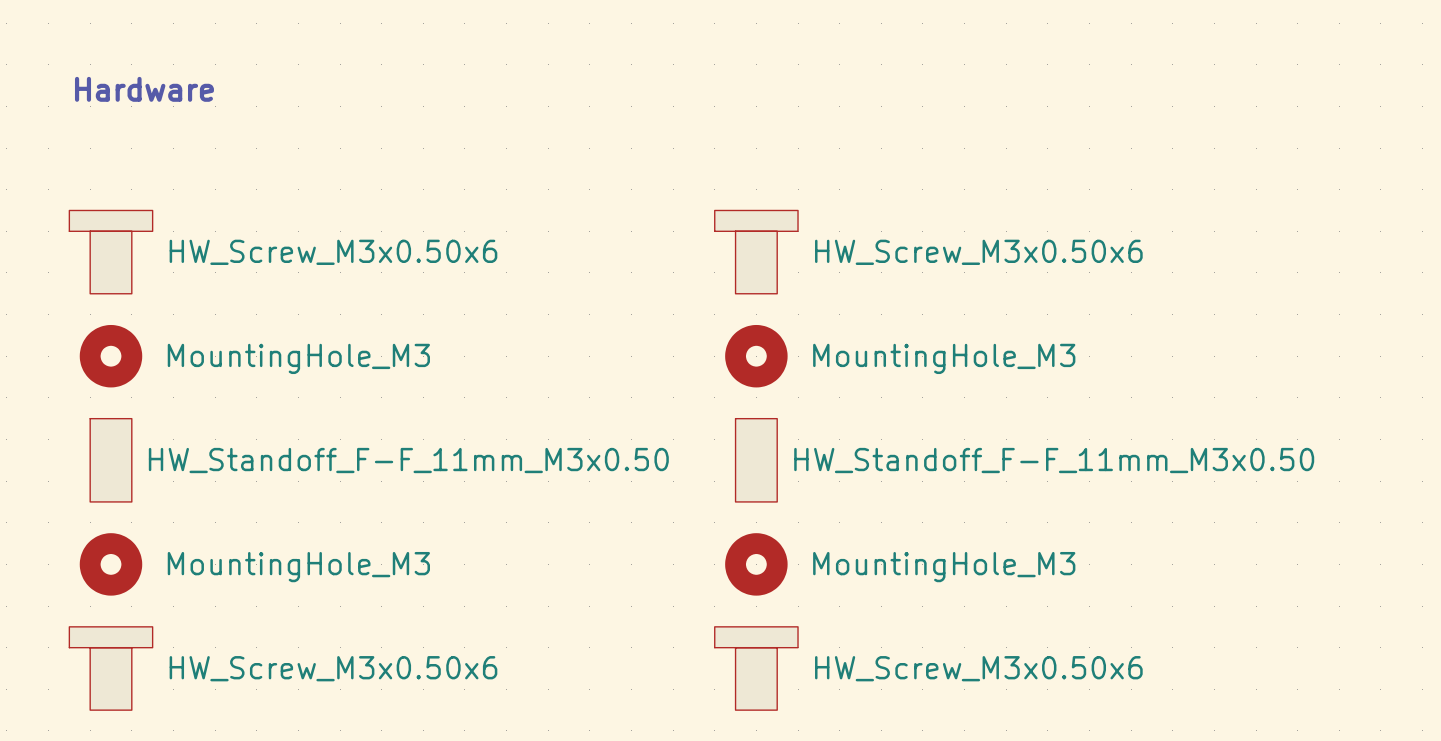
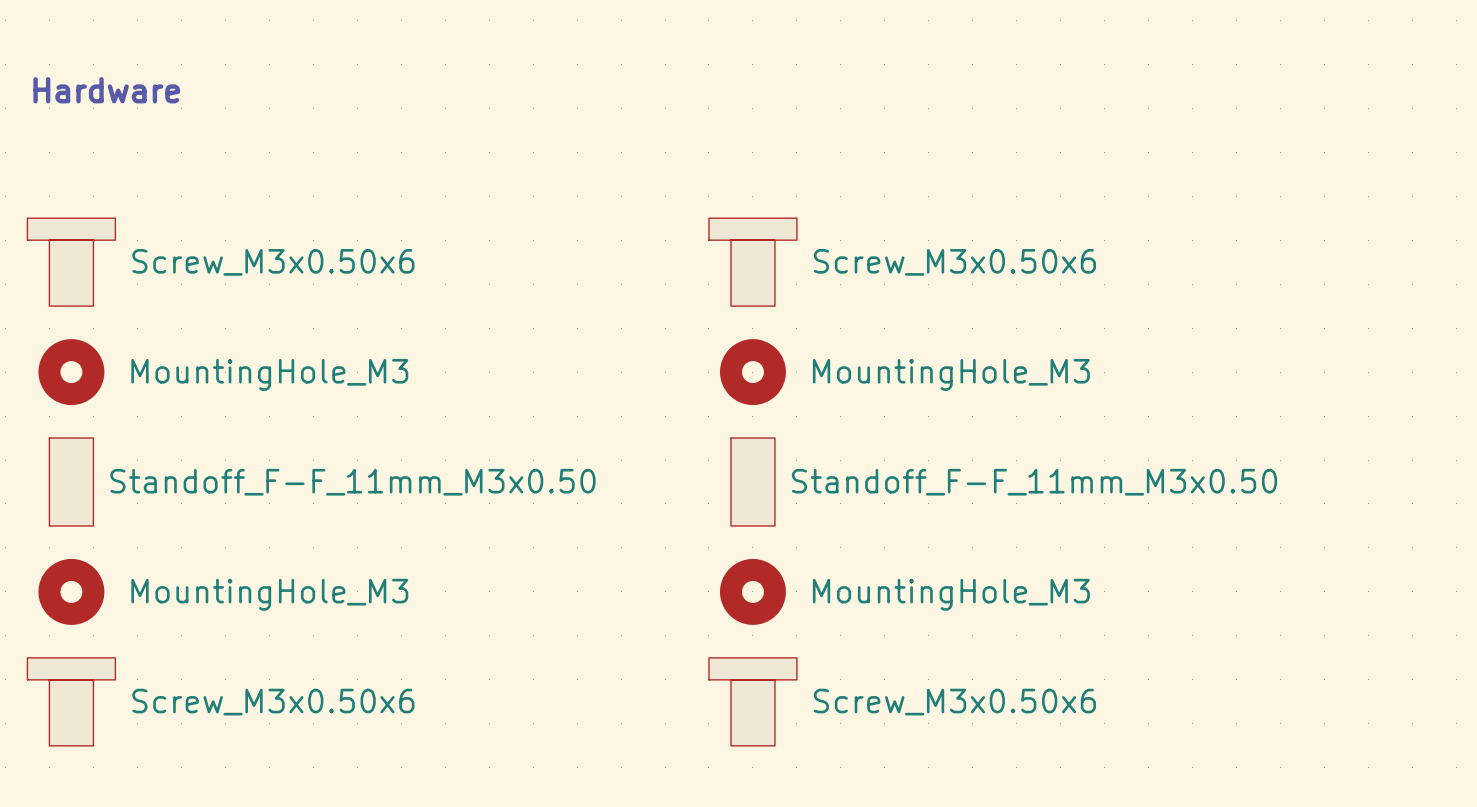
part value: HW_Screw_M3x0.50x6 (333, 252) -> Screw_M3x0.50x6 (273, 262)
part value: HW_Screw_M3x0.50x6 (978, 252) -> Screw_M3x0.50x6 (954, 262)
part value: HW_Standoff_F-F_11mm_M3x0.50 (408, 460) -> Standoff_F-F_11mm_M3x0.50 (352, 482)
part value: HW_Standoff_F-F_11mm_M3x0.50 (1054, 460) -> Standoff_F-F_11mm_M3x0.50 (1034, 482)
part value: HW_Screw_M3x0.50x6 (333, 668) -> Screw_M3x0.50x6 (273, 702)
part value: HW_Screw_M3x0.50x6 (978, 668) -> Screw_M3x0.50x6 (954, 702)

